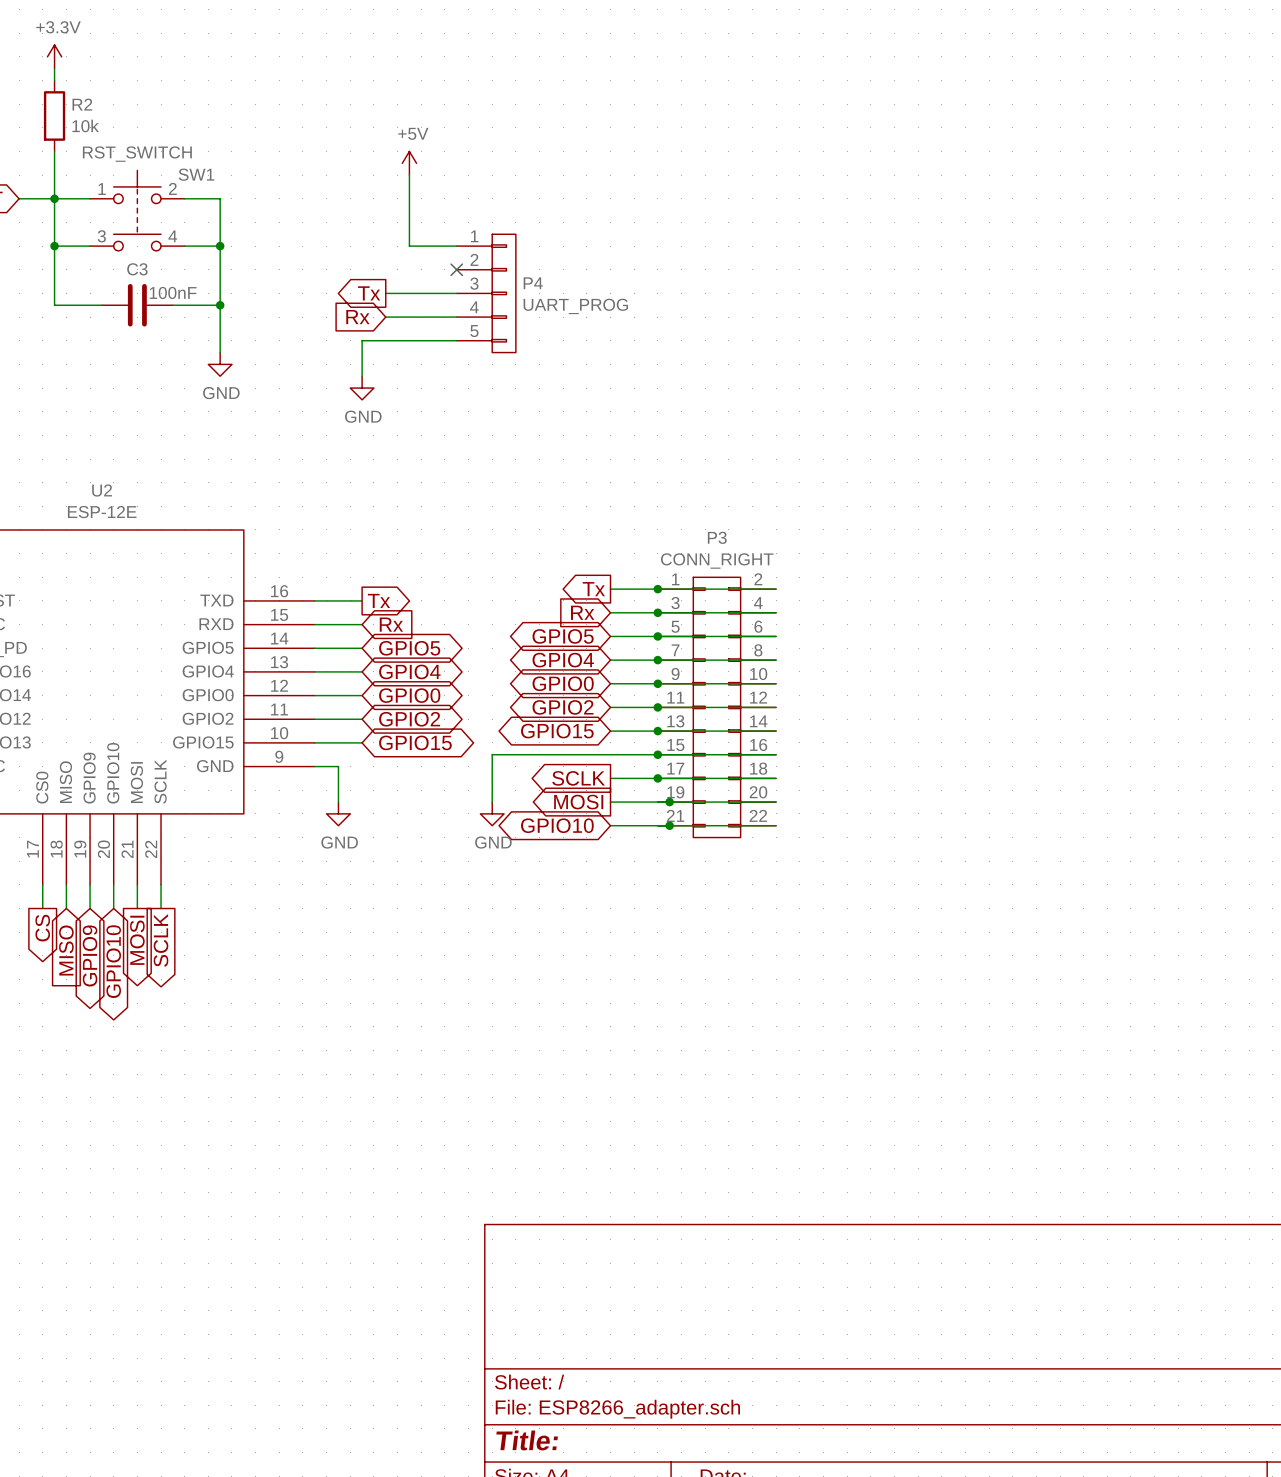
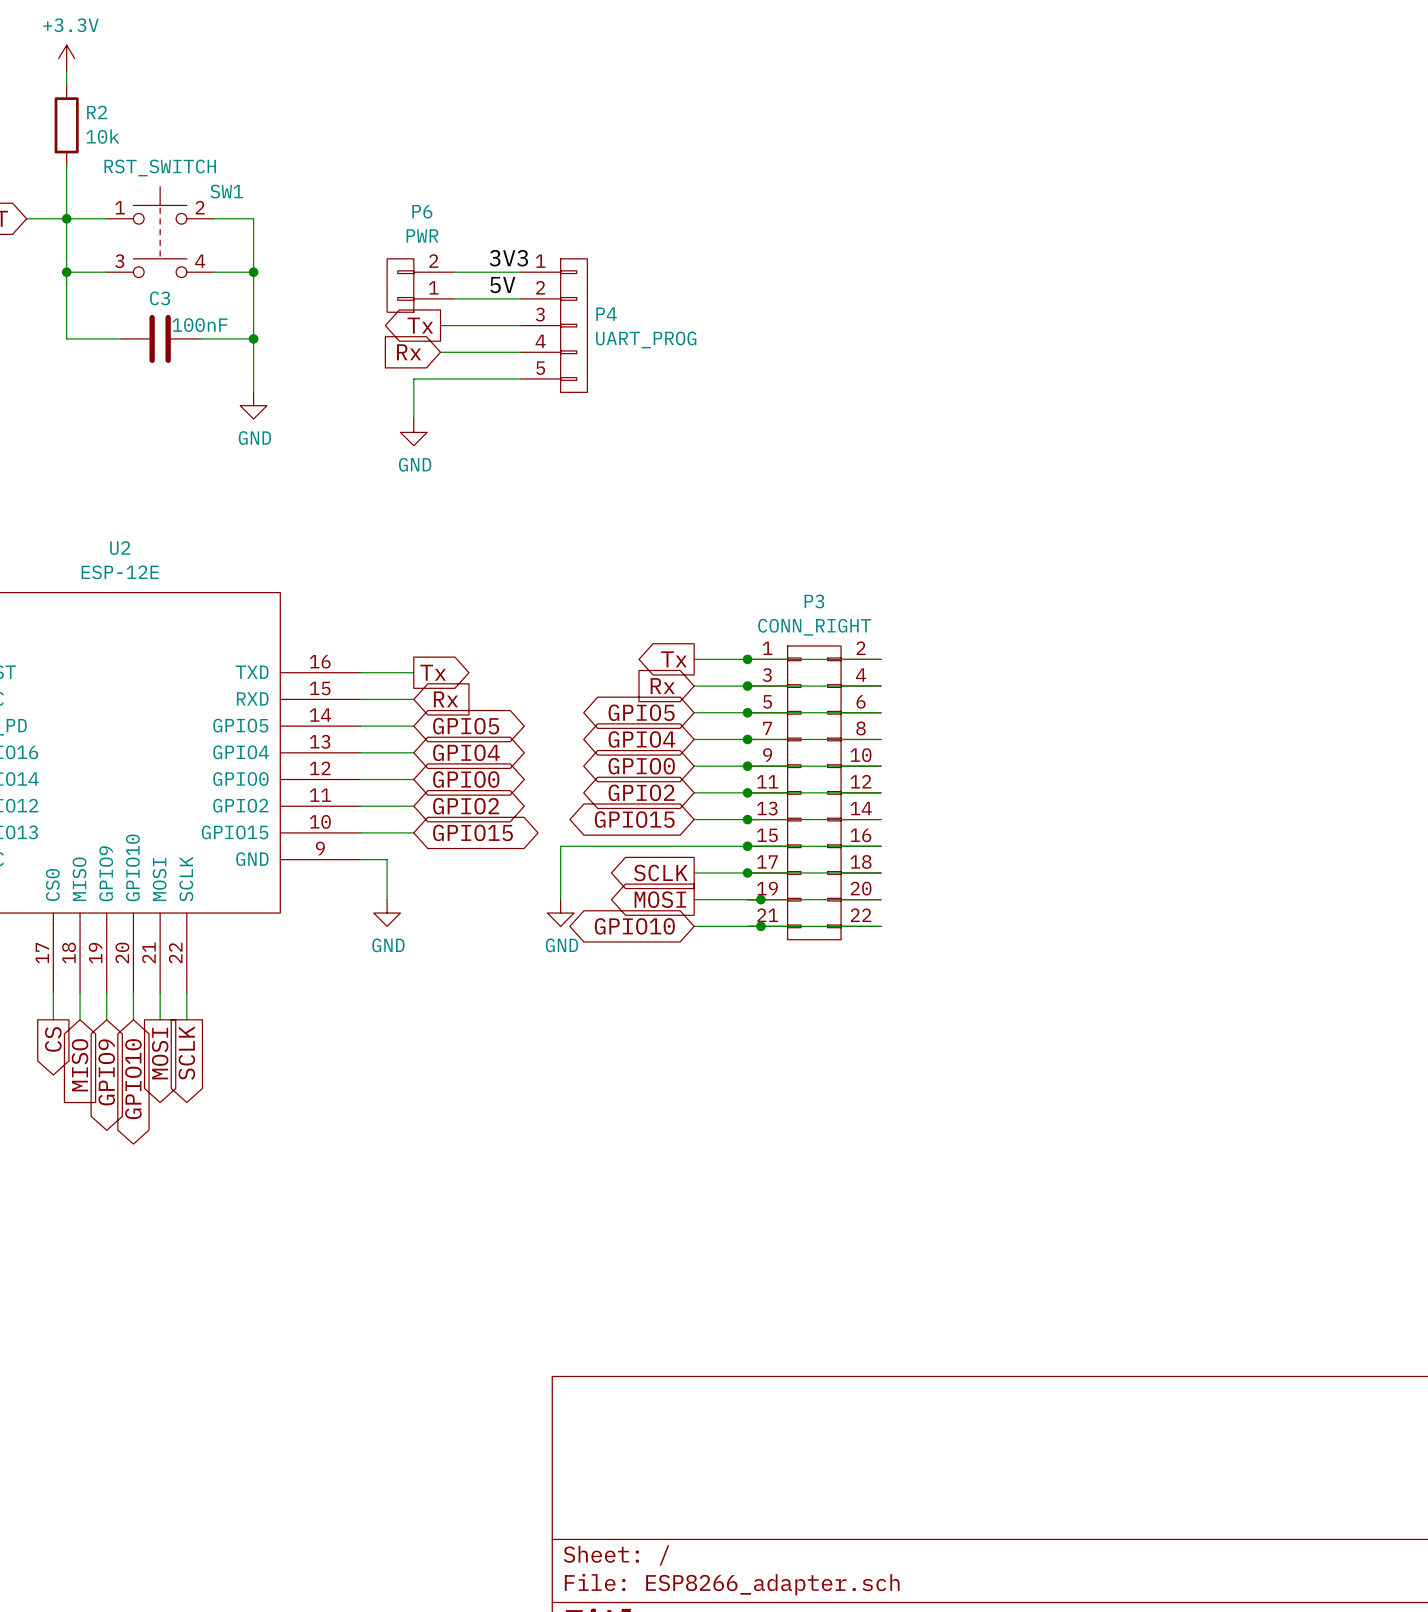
power symbol: +5V (409, 163) -> none
wire: (409, 175) (409, 246) -> (453, 272) (467, 272)
label: none -> 3V3 (508, 258)
P6: none -> PWR (420, 285)
label: none -> 5V (502, 285)
wire: none -> (453, 298) (520, 298)
no-connect mark: (456, 269) -> none

